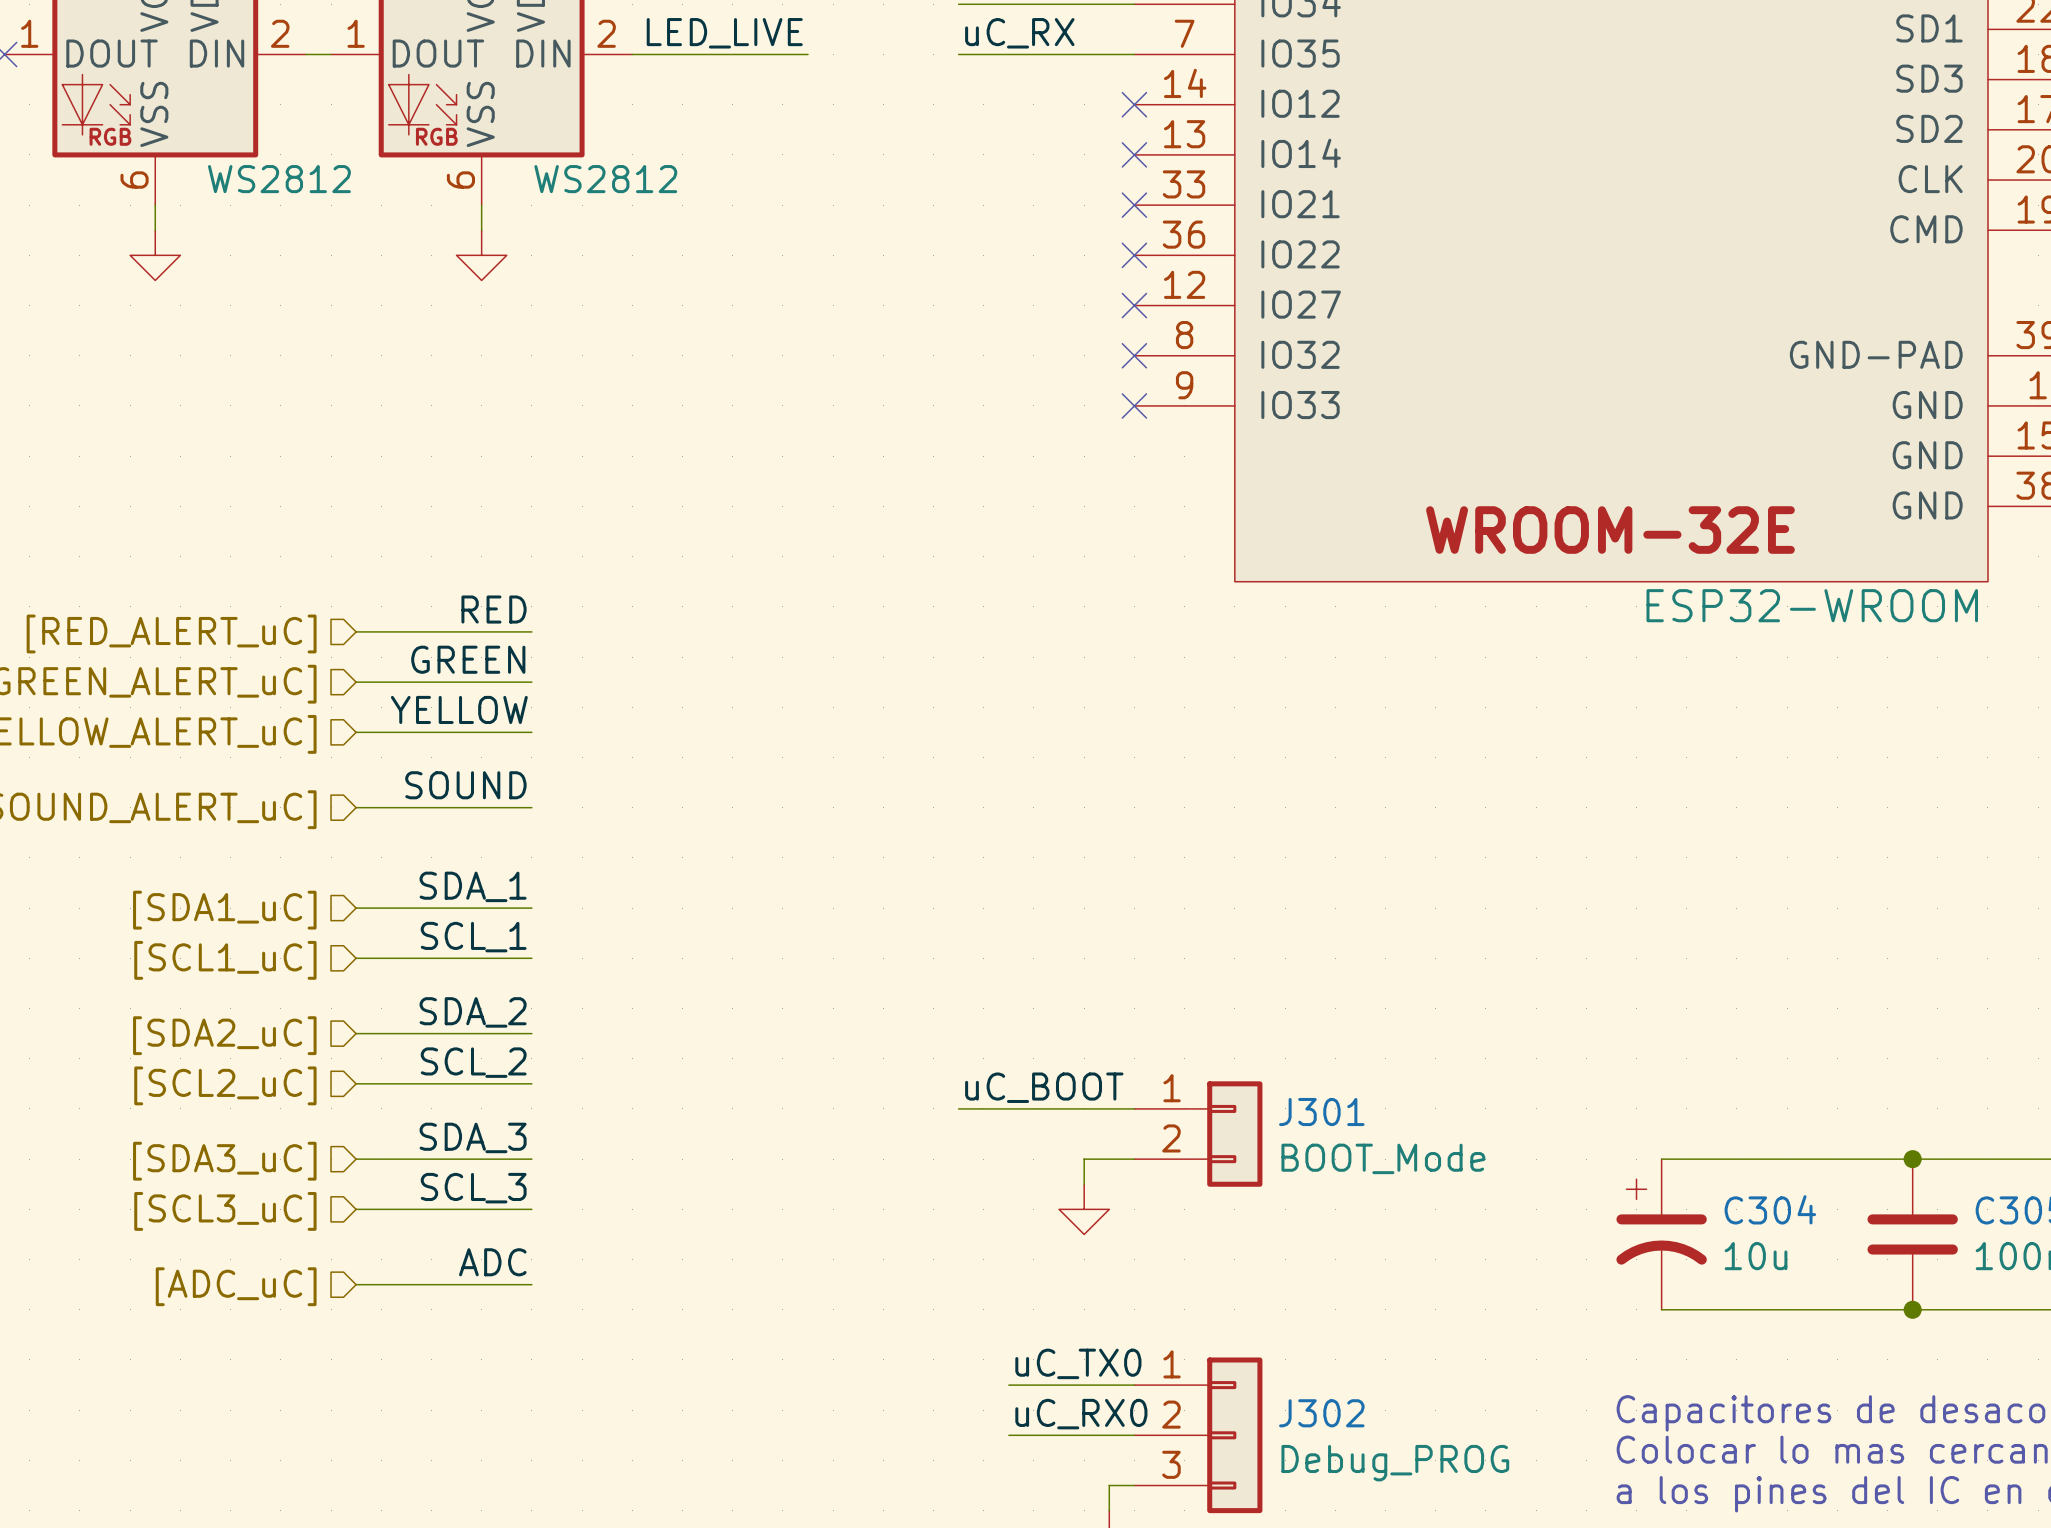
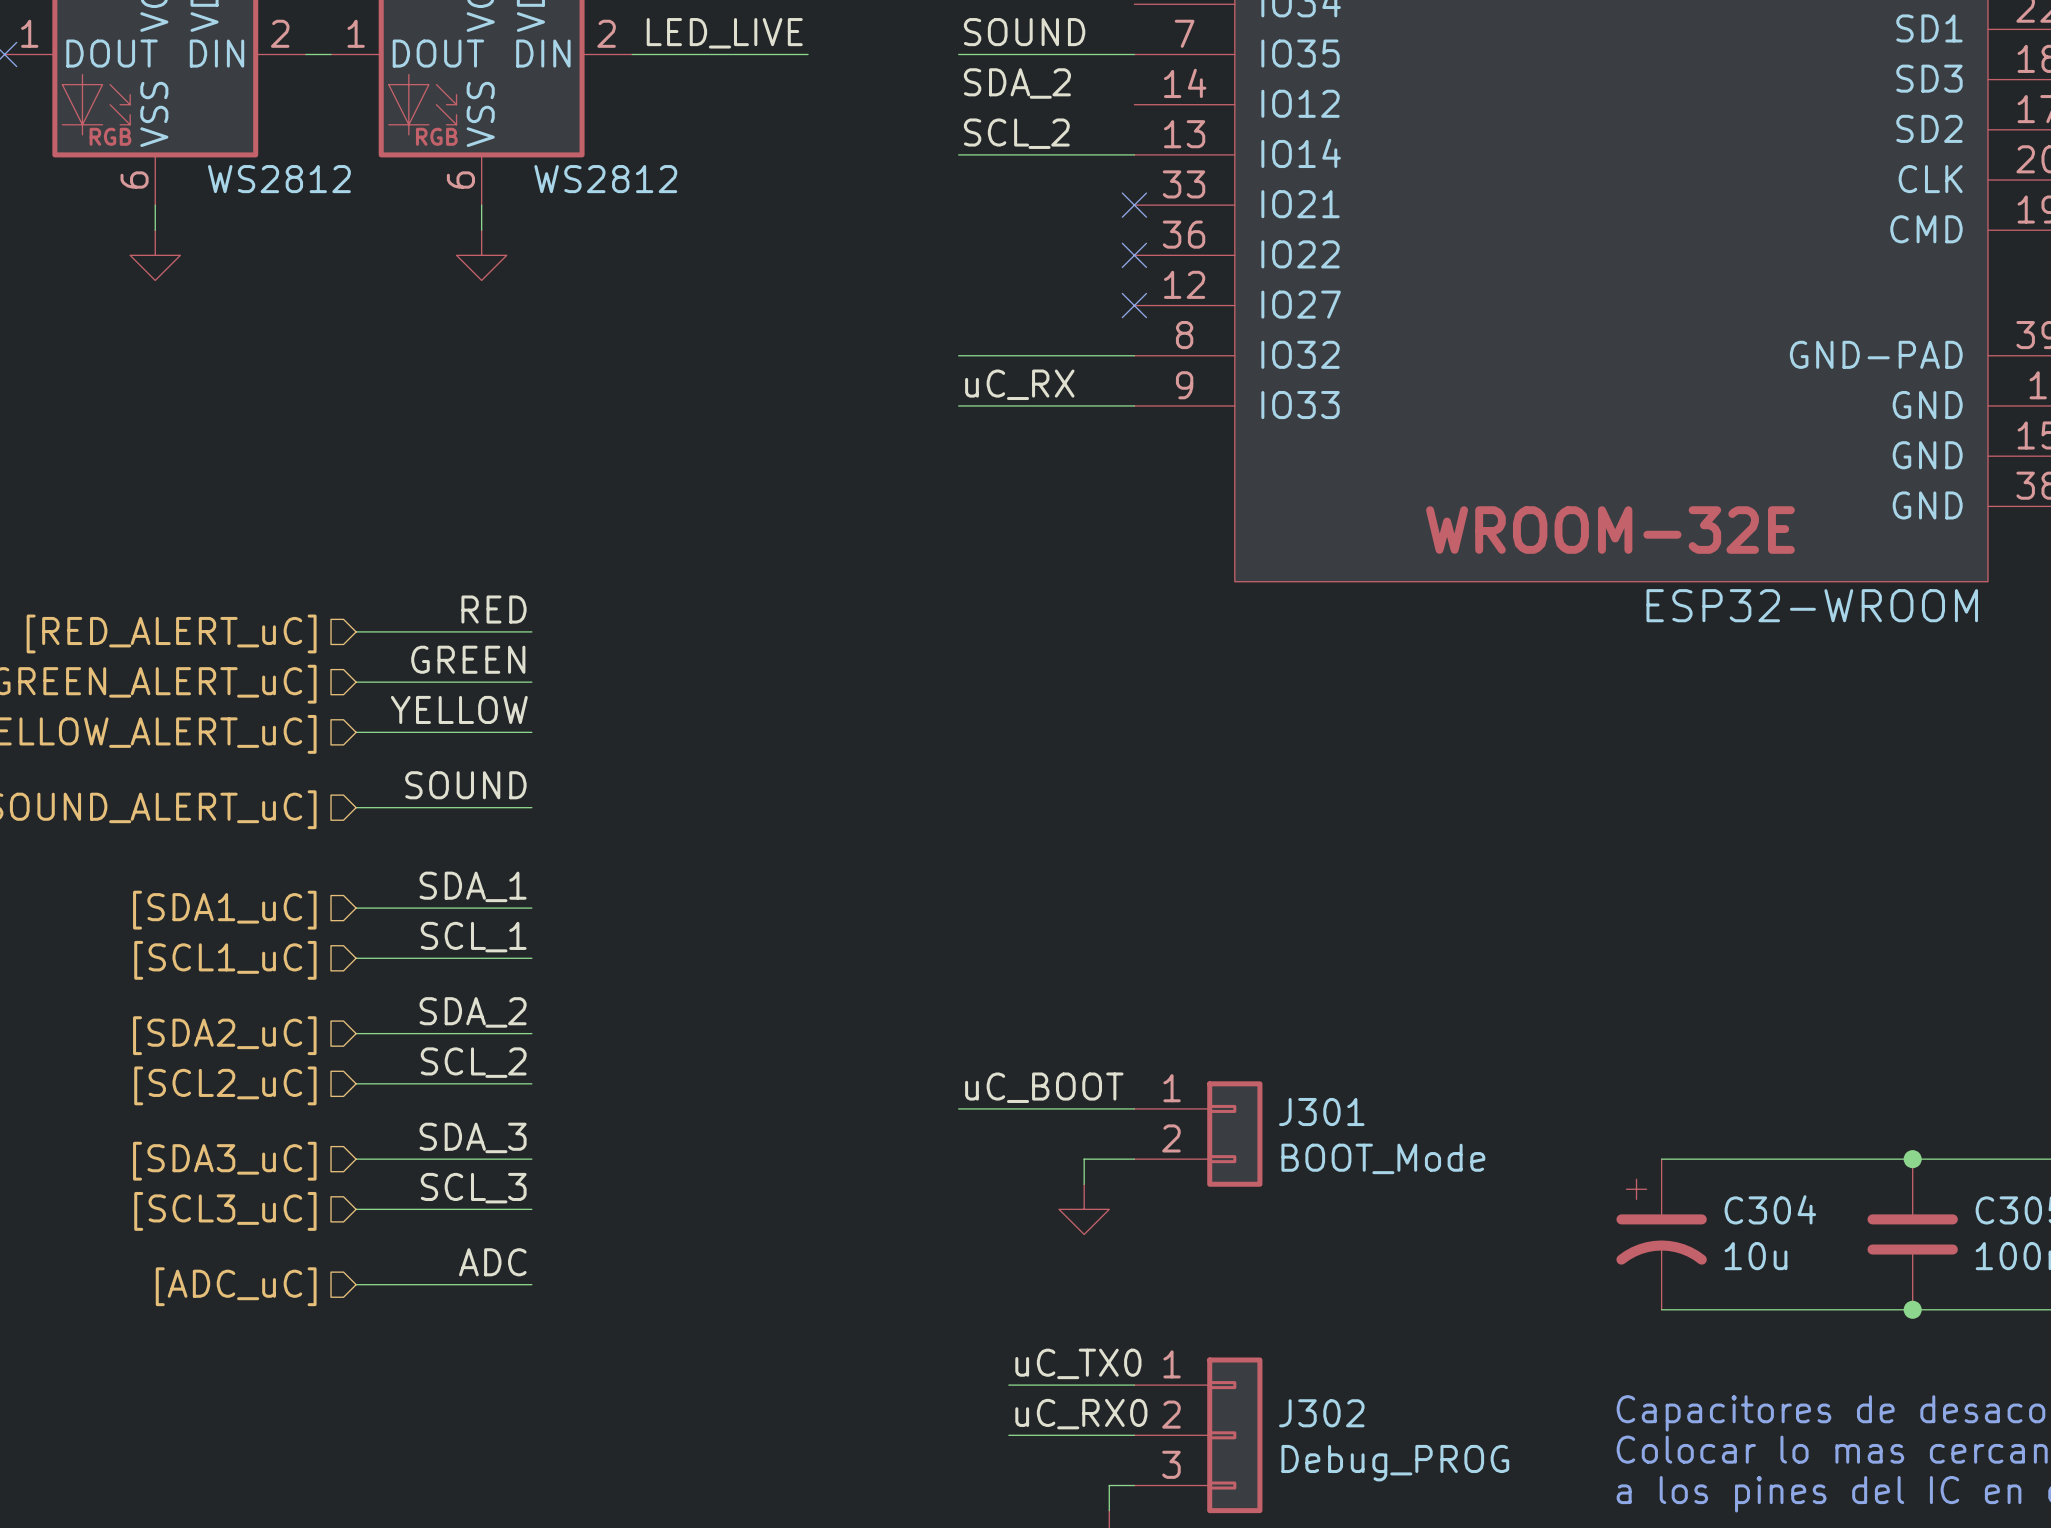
wire: (958, 4) (1134, 4) -> (958, 154) (1134, 154)
label: uC_RX (1019, 33) -> SOUND (1024, 32)
label: none -> SDA_2 (1017, 83)
no-connect mark: (1134, 104) -> none
label: none -> SCL_2 (1016, 133)
no-connect mark: (1134, 154) -> none
wire: none -> (958, 355) (1134, 355)
no-connect mark: (1134, 355) -> none
label: none -> uC_RX (1019, 384)
wire: none -> (958, 405) (1134, 405)
no-connect mark: (1134, 405) -> none

